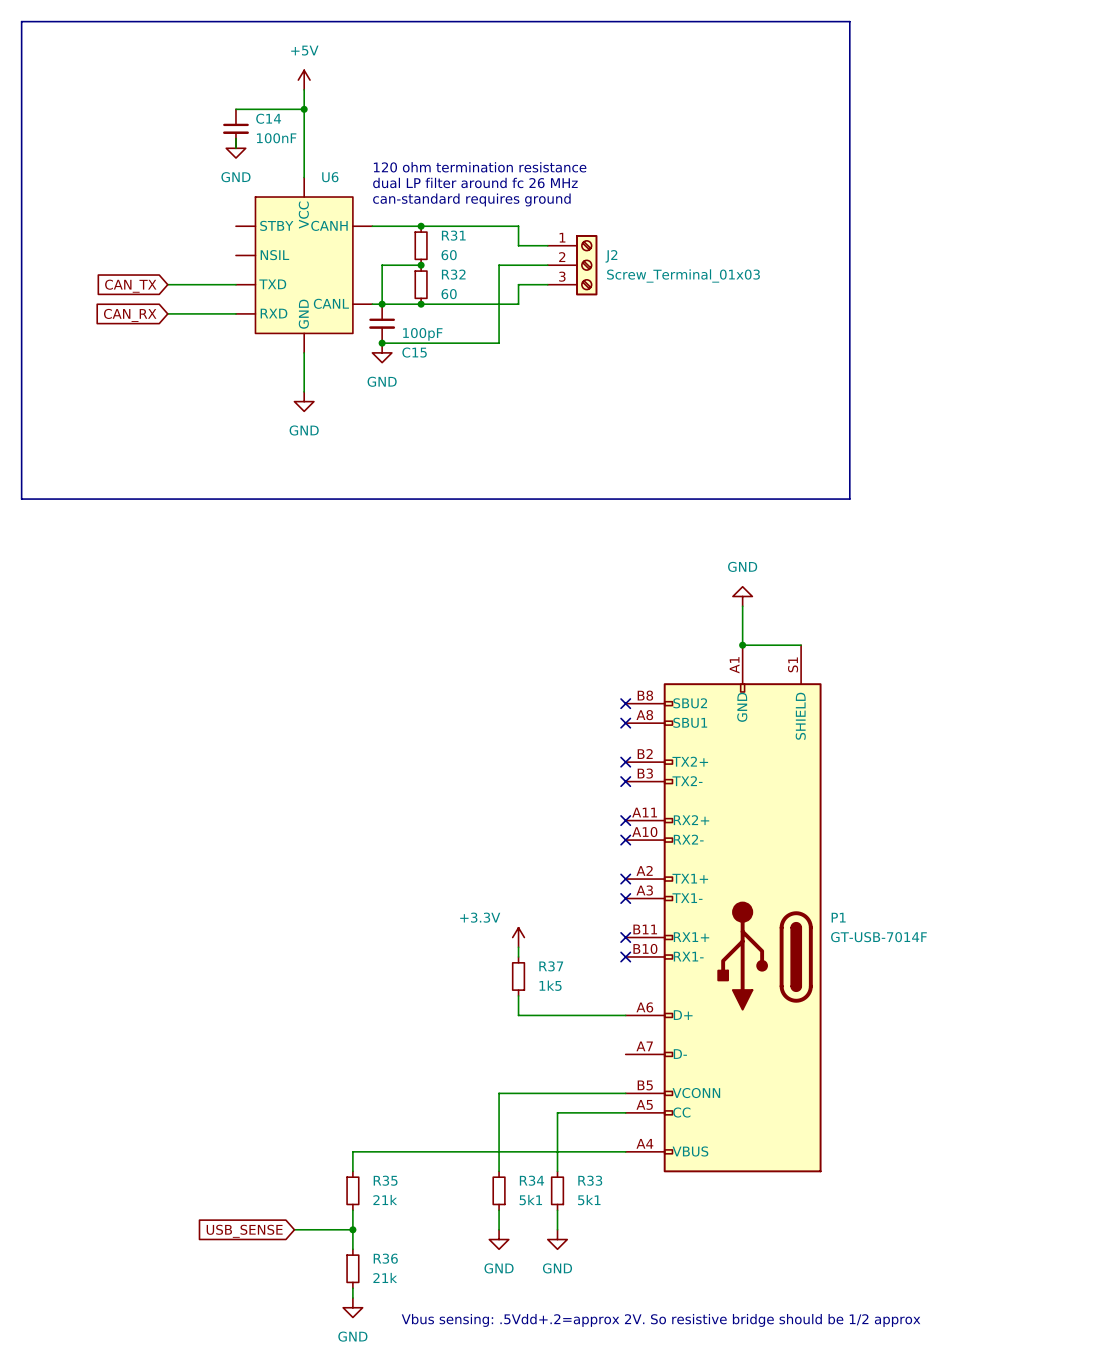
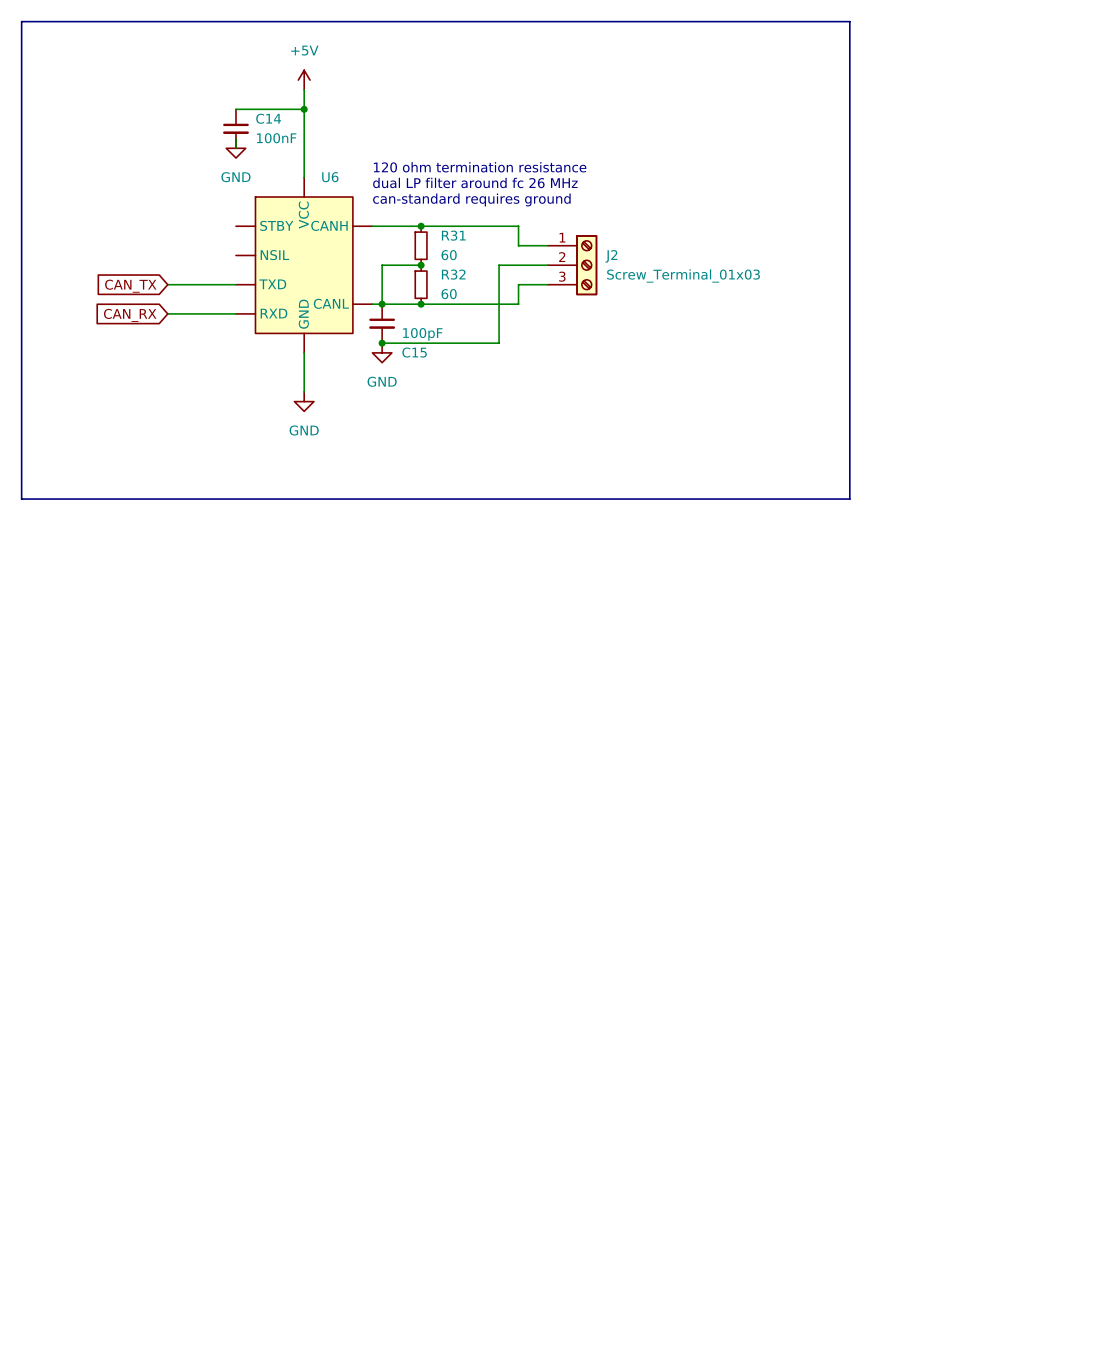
power symbol: GND (742, 596) -> none
wire: (742, 606) (742, 645) (801, 645) -> none
junction: (742, 645) -> none
no-connect mark: (625, 703) -> none
no-connect mark: (625, 723) -> none
no-connect mark: (625, 762) -> none
no-connect mark: (625, 781) -> none
no-connect mark: (625, 820) -> none
no-connect mark: (625, 840) -> none
no-connect mark: (625, 879) -> none
no-connect mark: (625, 898) -> none
P1: GT-USB-7014F (723, 908) -> none
power symbol: +3.3V (518, 937) -> none
no-connect mark: (625, 937) -> none
wire: (518, 947) (518, 956) -> none
no-connect mark: (625, 956) -> none
R37: 1k5 (518, 976) -> none
wire: (518, 995) (518, 1015) (625, 1015) -> none
wire: (625, 1093) (499, 1093) (499, 1171) -> none
wire: (625, 1112) (557, 1112) (557, 1171) -> none
wire: (625, 1151) (352, 1151) (352, 1171) -> none
R35: 21k (352, 1190) -> none
R34: 5k1 (499, 1190) -> none
R33: 5k1 (557, 1190) -> none
wire: (352, 1210) (352, 1249) -> none
wire: (499, 1210) (499, 1229) -> none
wire: (557, 1210) (557, 1229) -> none
wire: (294, 1229) (352, 1229) -> none
junction: (352, 1229) -> none
global label: USB_SENSE (244, 1231) -> none
power symbol: GND (499, 1239) -> none
power symbol: GND (557, 1239) -> none
R36: 21k (352, 1268) -> none
wire: (352, 1288) (352, 1298) -> none
power symbol: GND (352, 1307) -> none
text: Vbus sensing: .5Vdd+.2=approx 2V. So resistive bridge should be 1/2 approx (661, 1320) -> none

